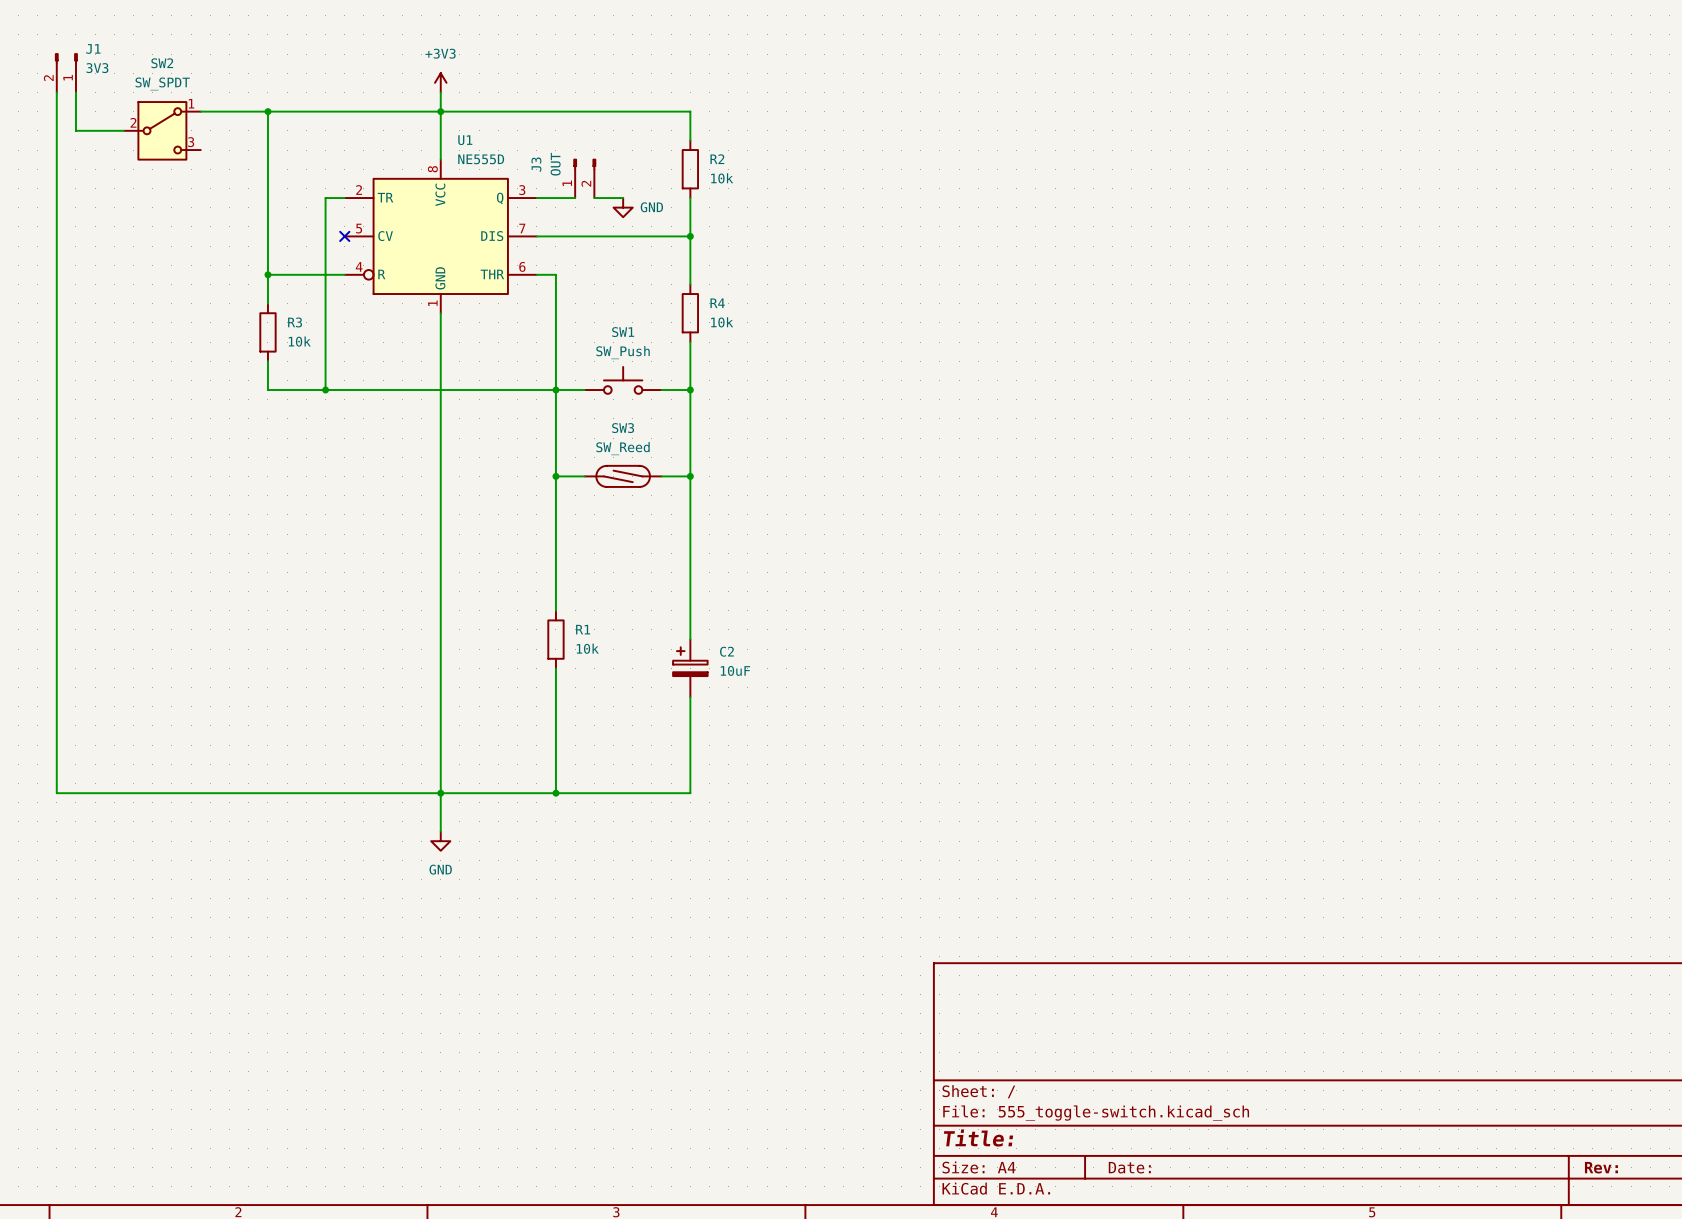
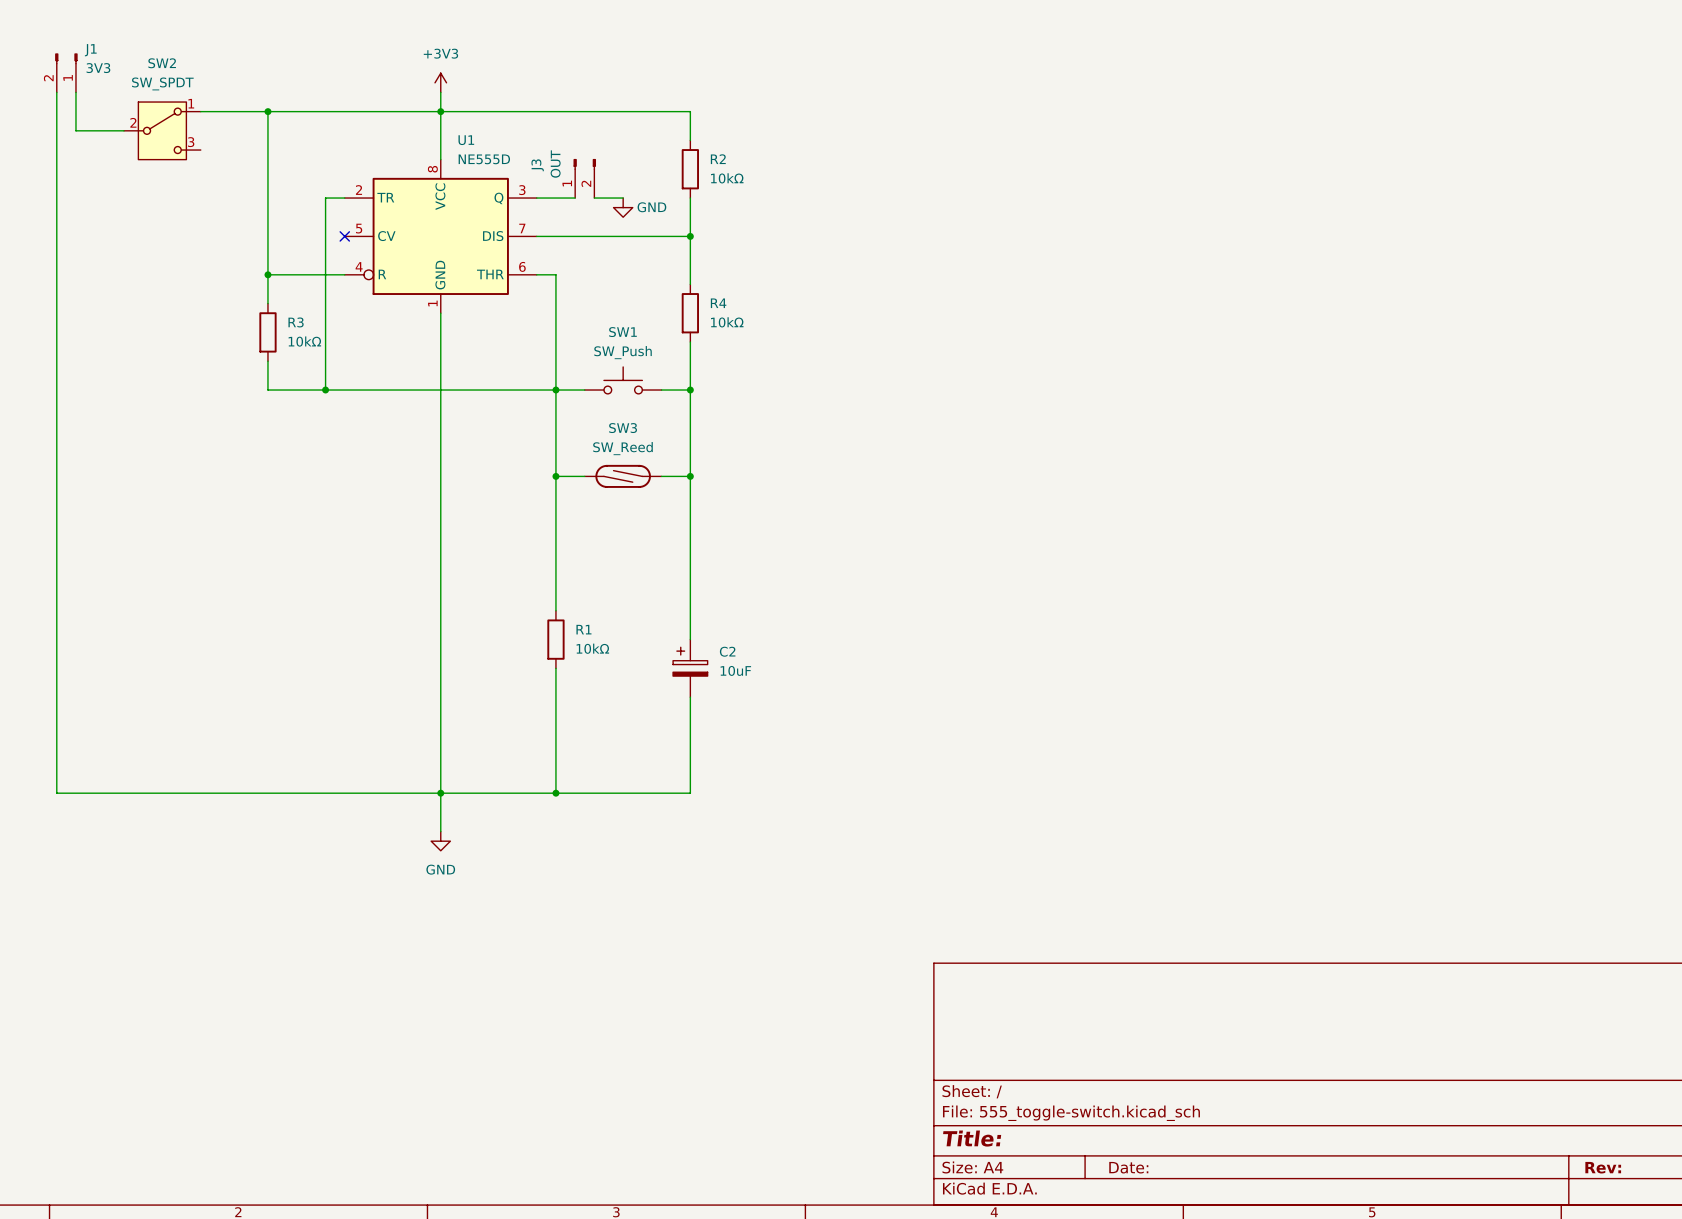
R2 value: 10k (722, 178) -> 10kΩ (727, 178)
R4 value: 10k (722, 322) -> 10kΩ (727, 322)
R3 value: 10k (299, 341) -> 10kΩ (304, 341)
R1 value: 10k (587, 648) -> 10kΩ (592, 648)

